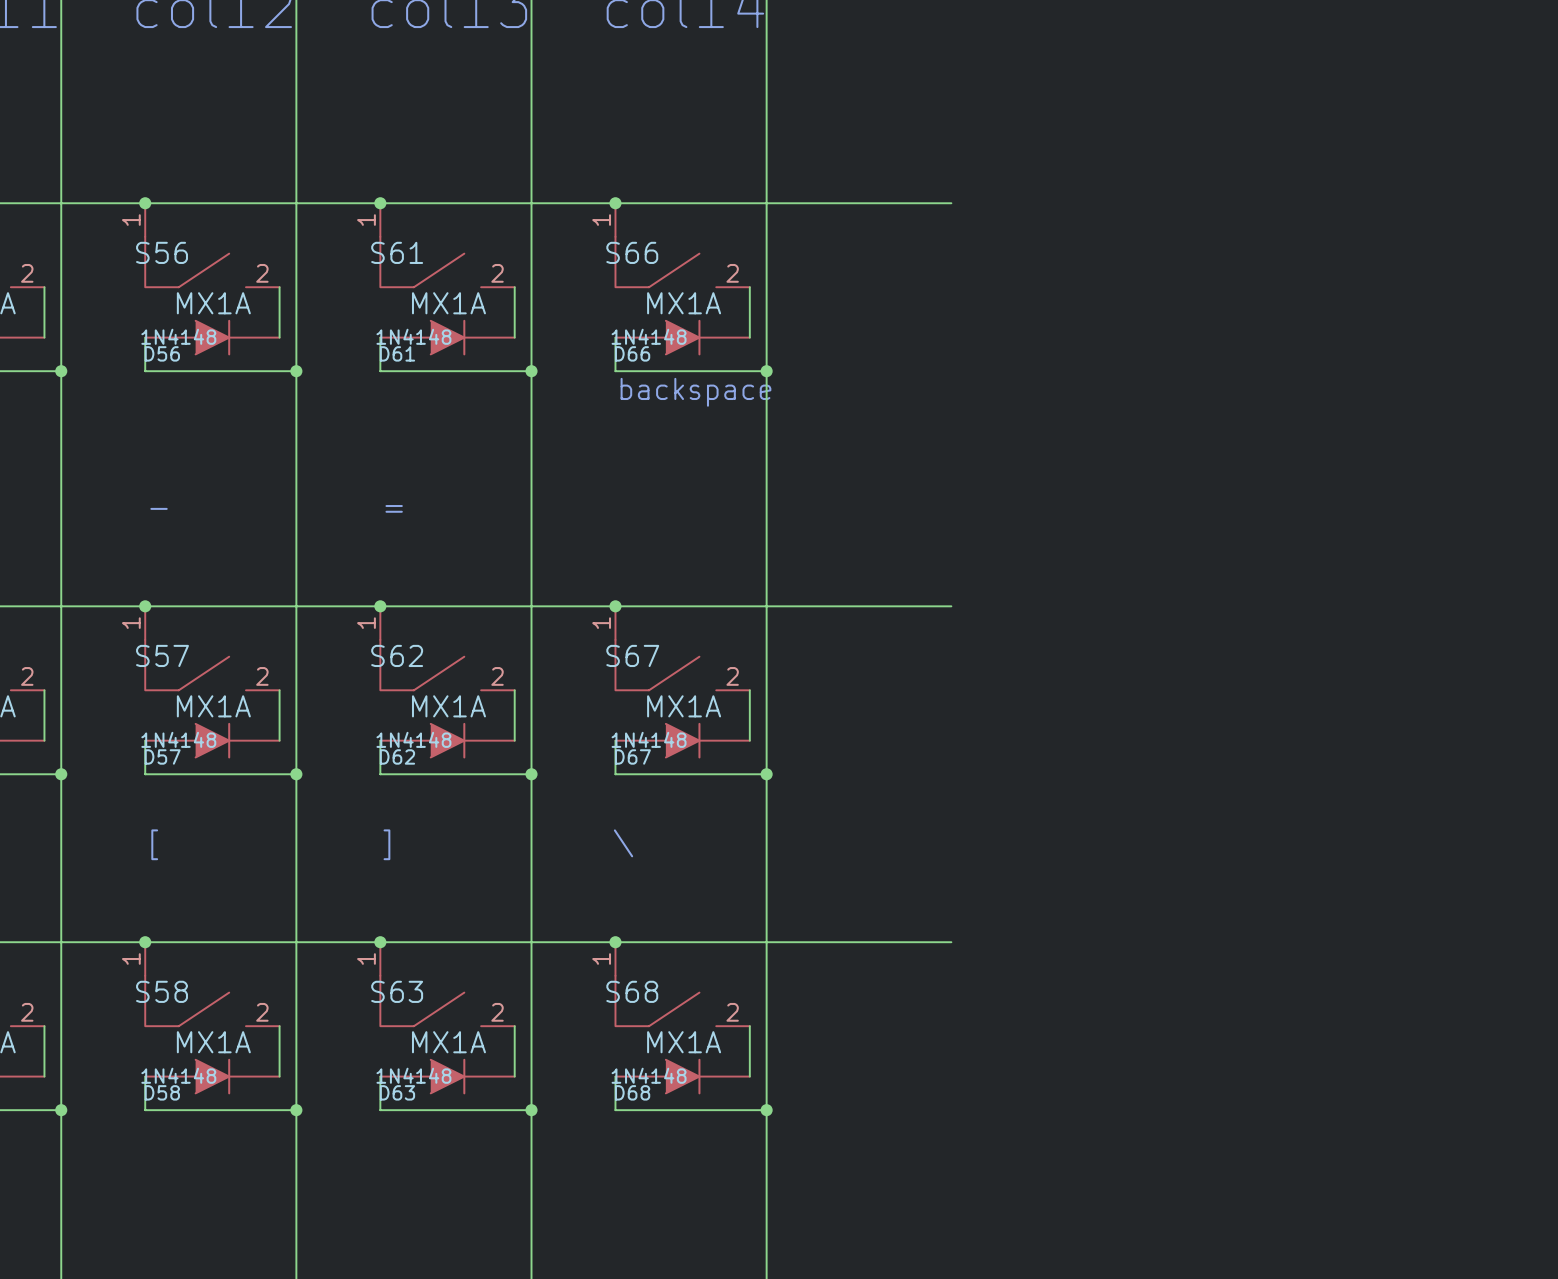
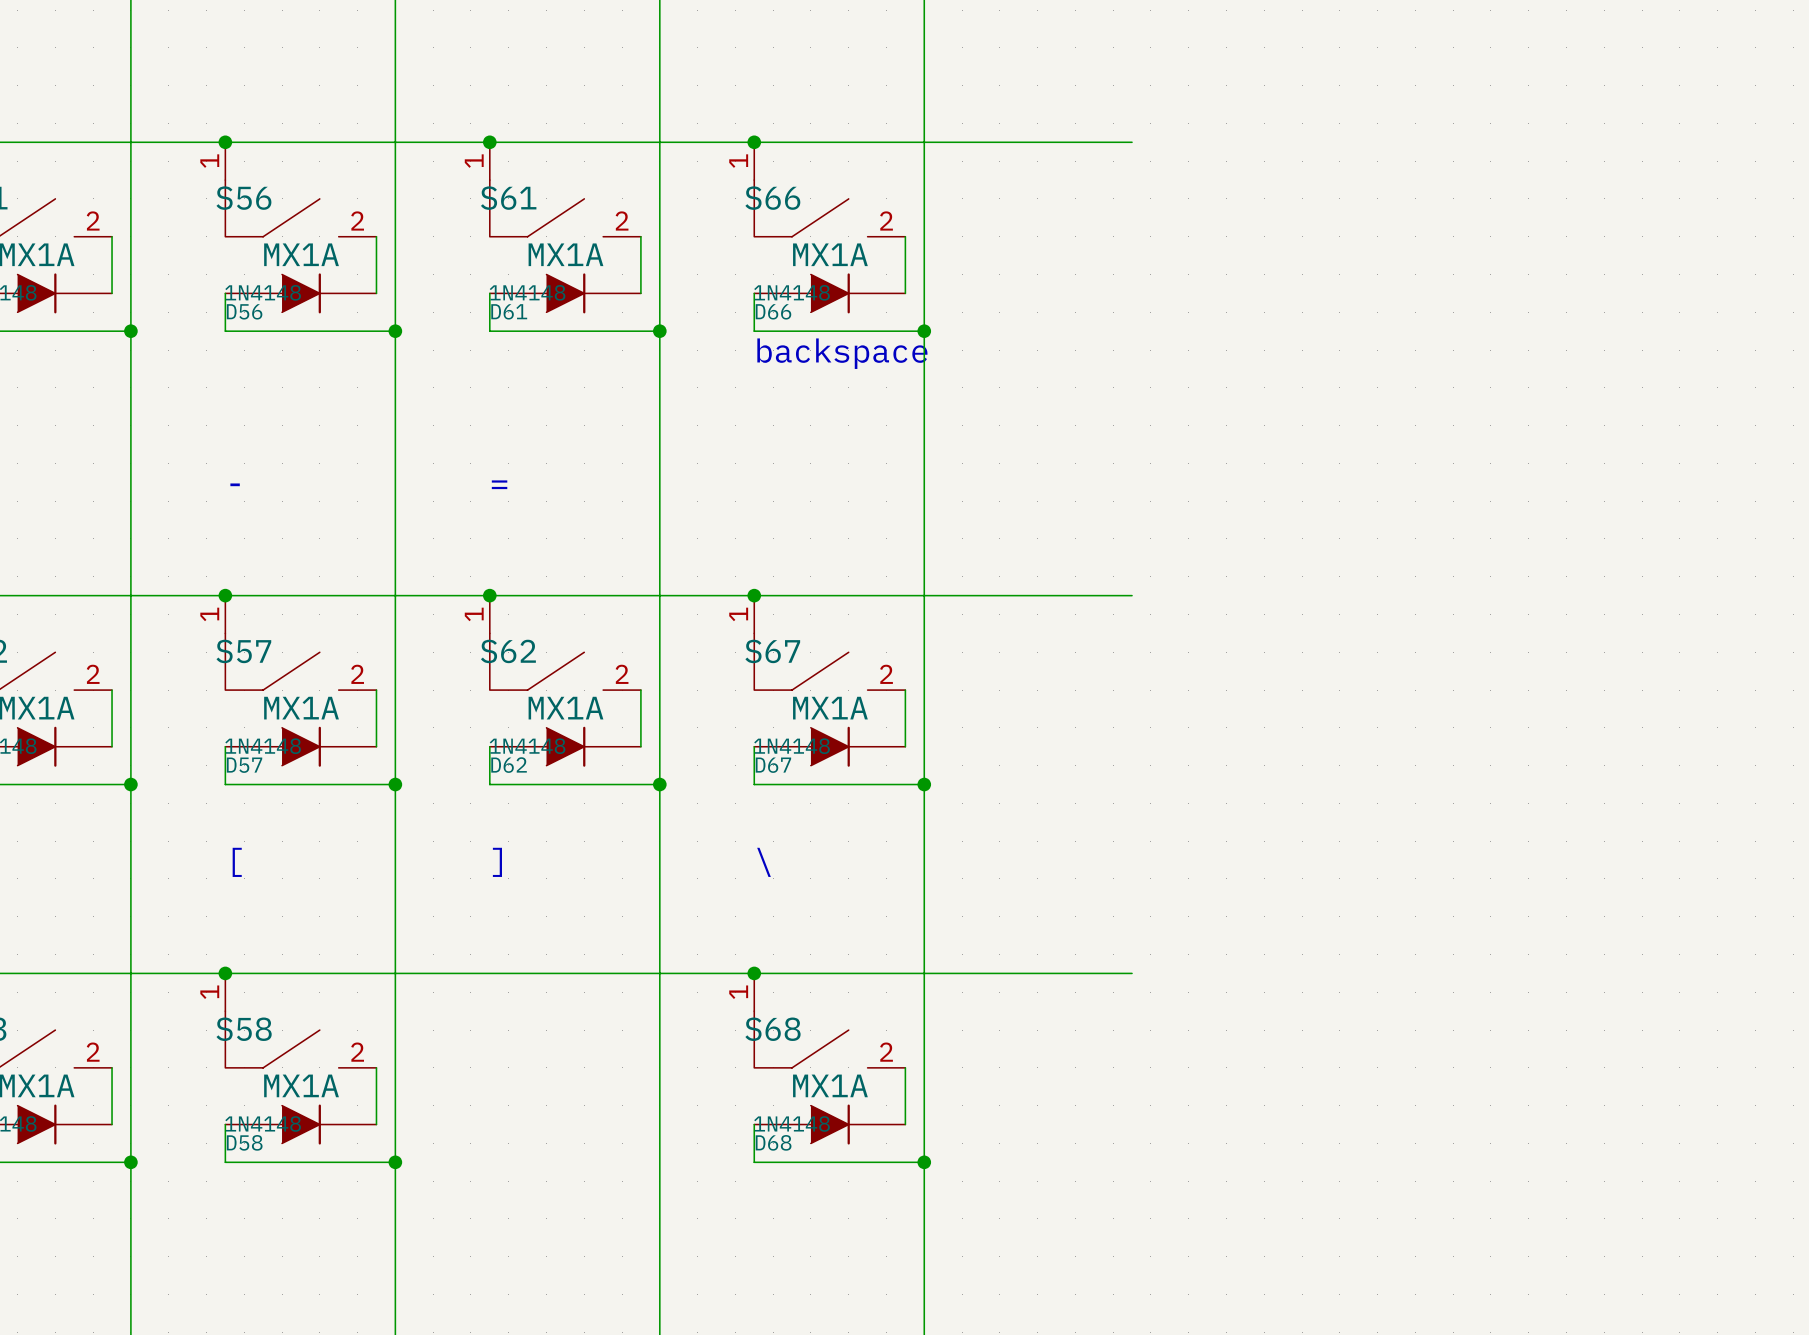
junction: (380, 942) -> none
S63: MX1A (447, 984) -> none
wire: (514, 1026) (514, 1076) -> none
wire: (380, 1076) (380, 1110) (531, 1110) -> none
D63: 1N4148 (447, 1076) -> none
junction: (531, 1110) -> none

